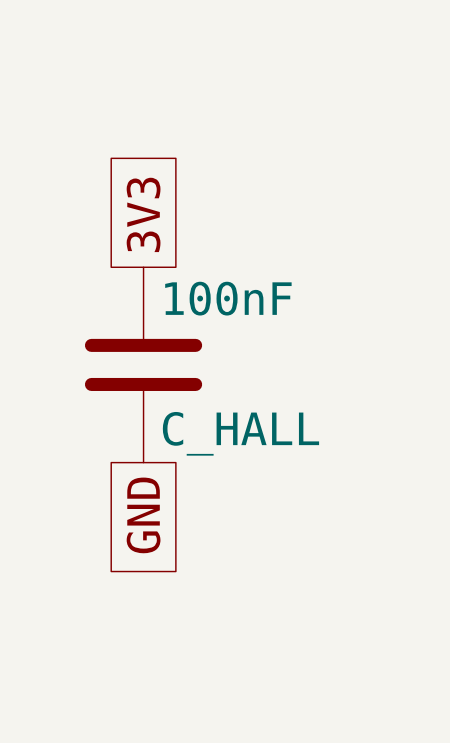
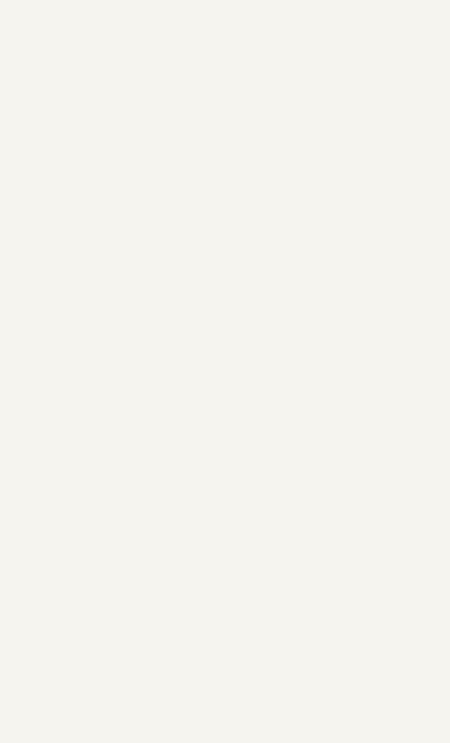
global label: 3V3 (143, 214) -> none
C_HALL: 100nF (143, 364) -> none
global label: GND (143, 515) -> none

